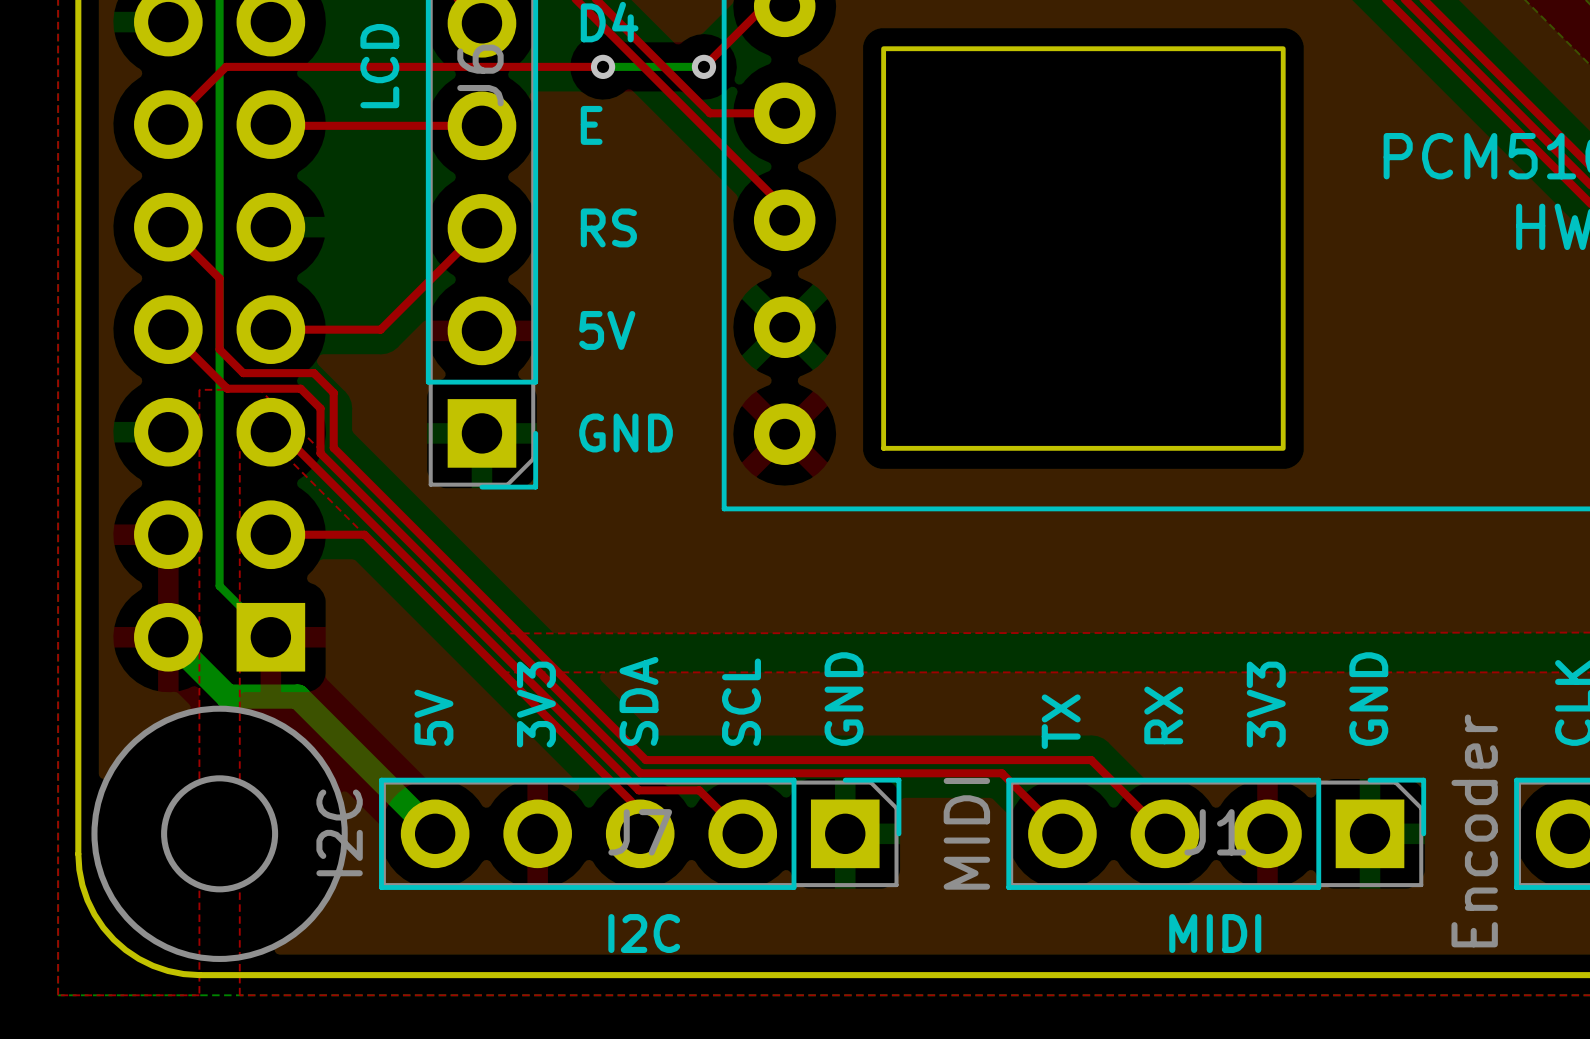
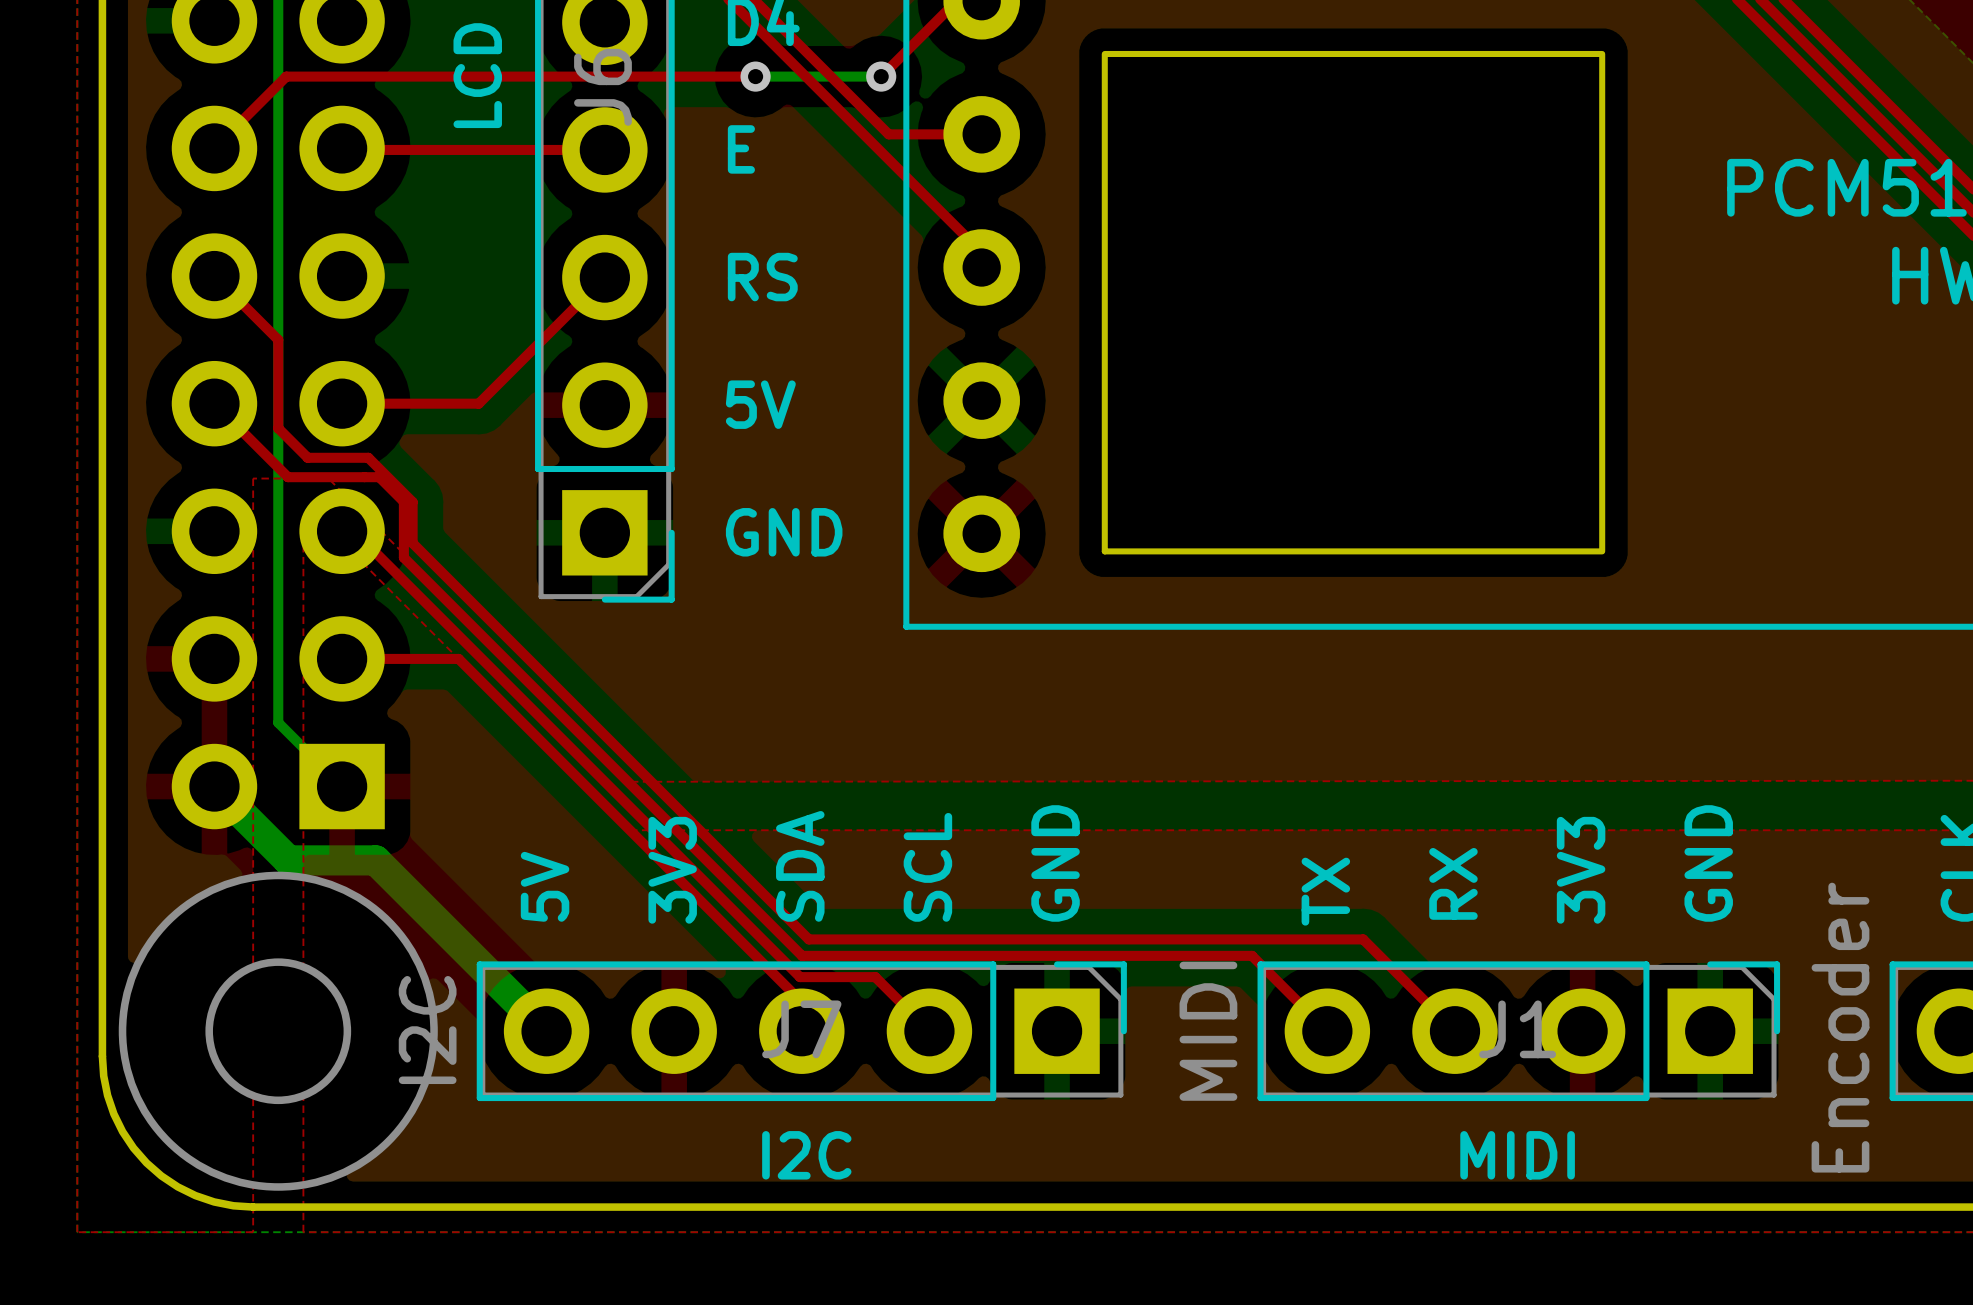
top track: (291, 373) (313, 373) (333, 392) (333, 447) -> (368, 457) (412, 502) (412, 543) (420, 550)

